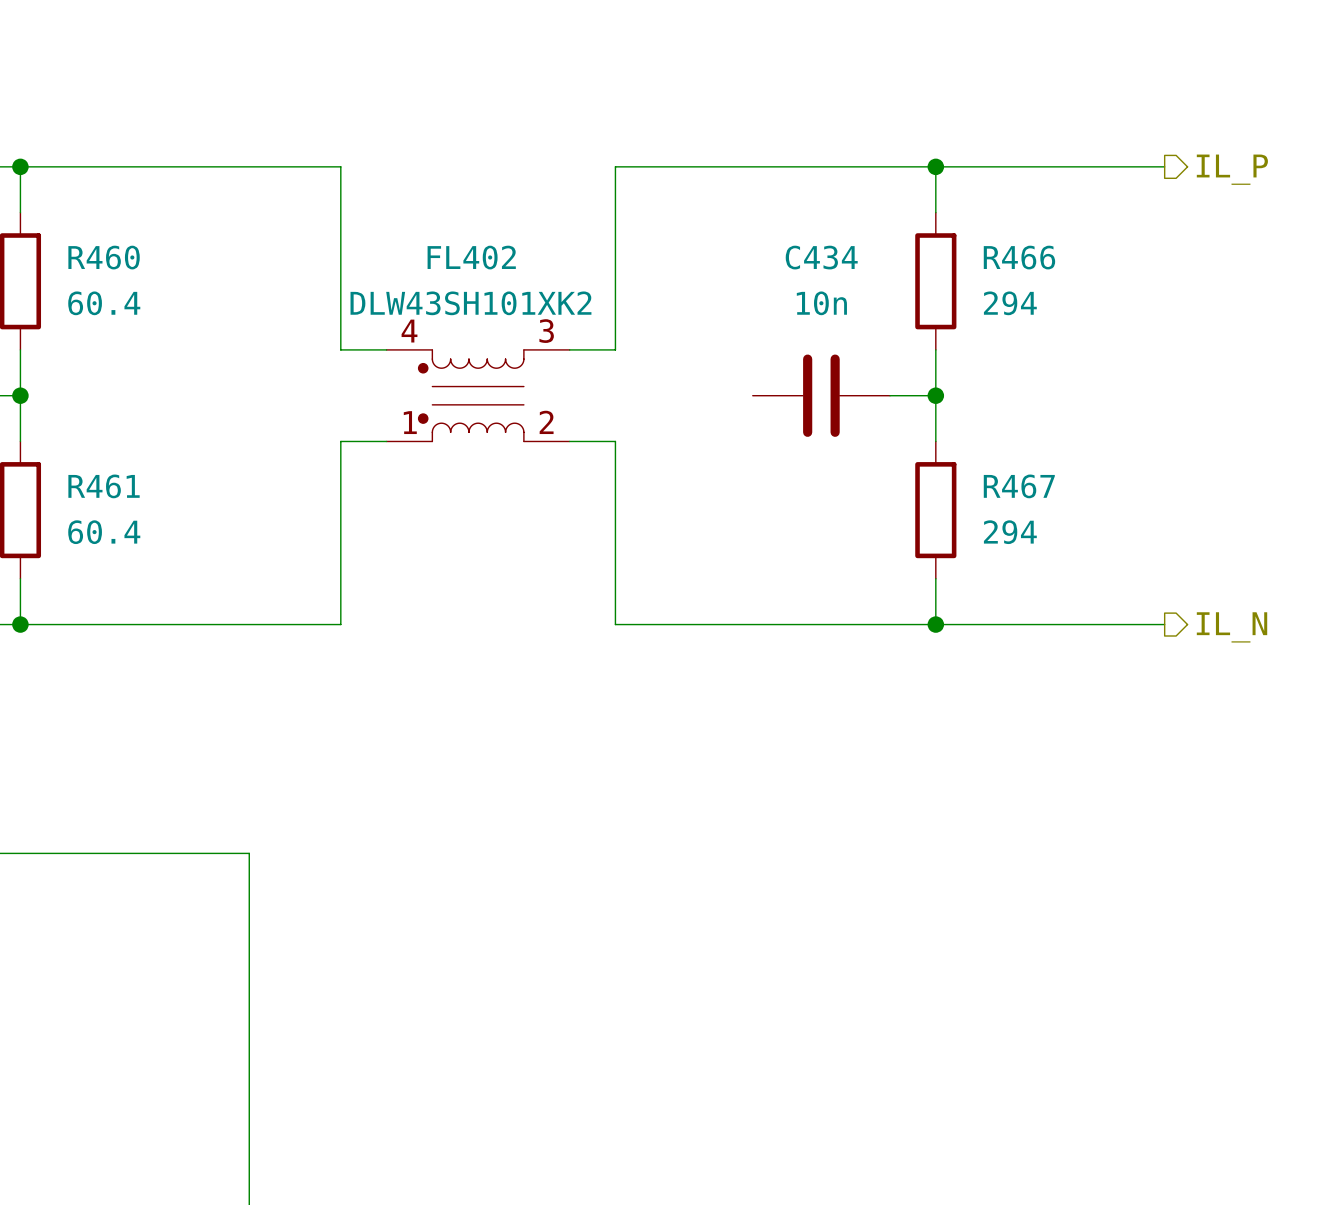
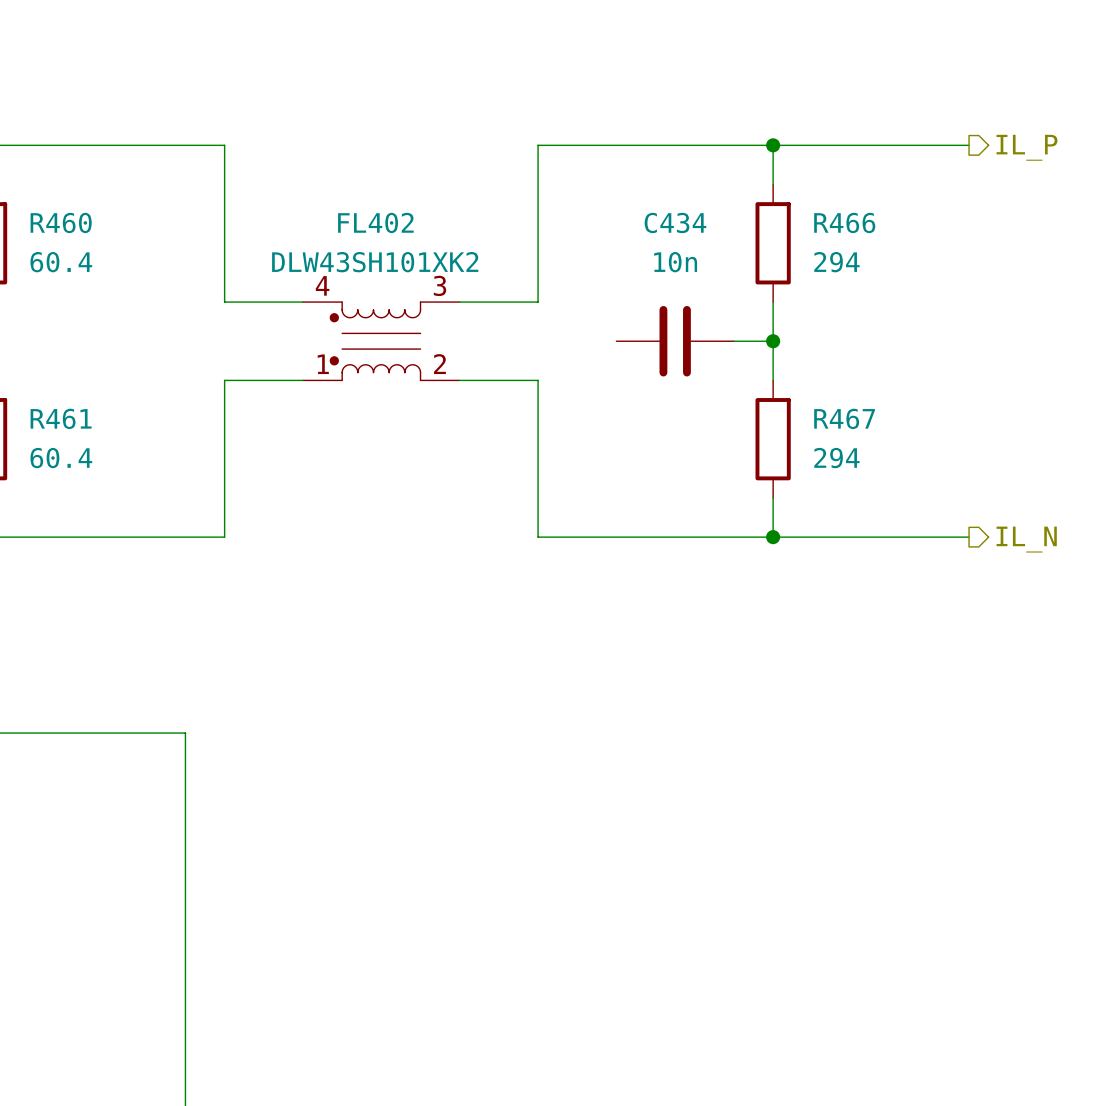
wire: (295, 166) (340, 166) (340, 349) -> (224, 145) (224, 302) (263, 302)
wire: (661, 166) (615, 166) (615, 349) -> (538, 145) (538, 302) (498, 302)
wire: (340, 441) (340, 624) (295, 624) -> (263, 380) (224, 380) (224, 537)
wire: (615, 441) (615, 624) (661, 624) -> (498, 380) (538, 380) (538, 537)

